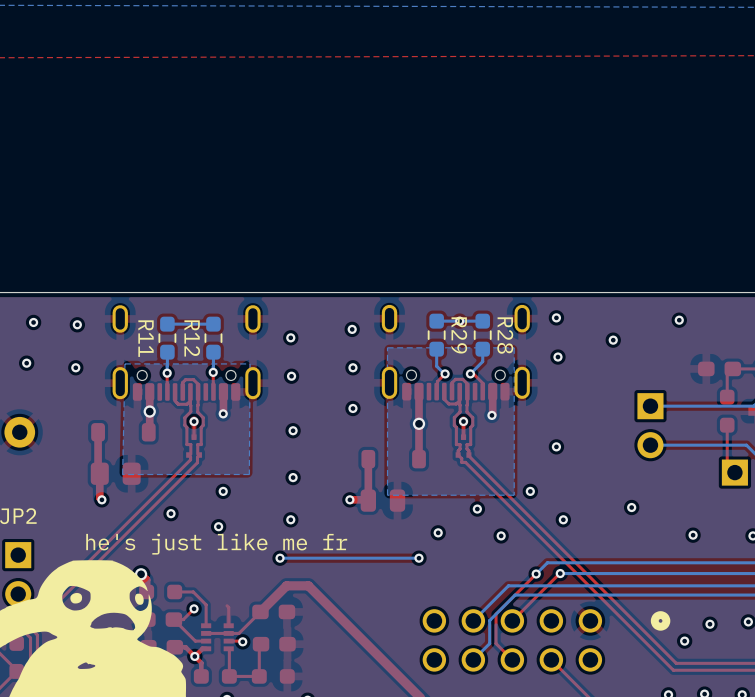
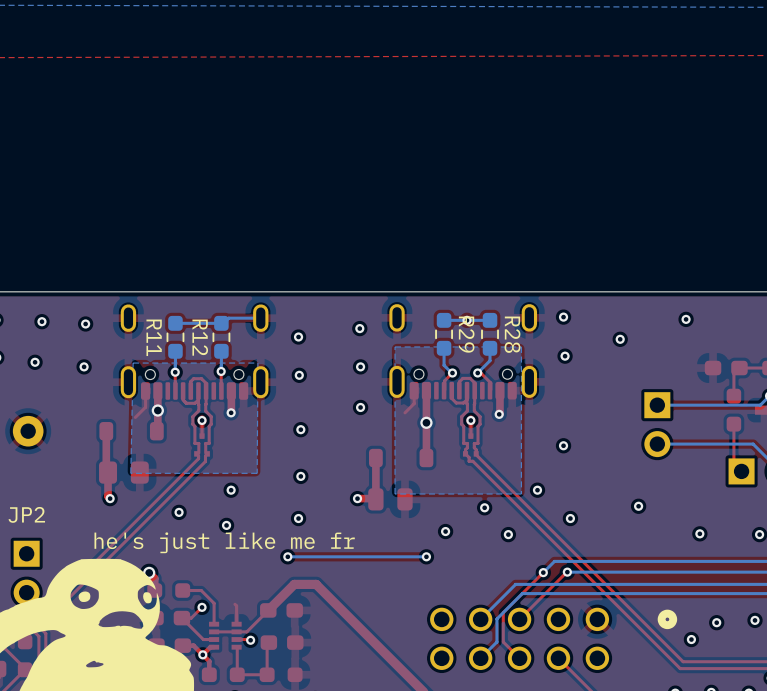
bottom track: none -> (260, 318) (228, 318) (221, 323)
top track: none -> (145, 391) (145, 407) (135, 417)
top track: none -> (414, 390) (414, 403) (404, 412)

